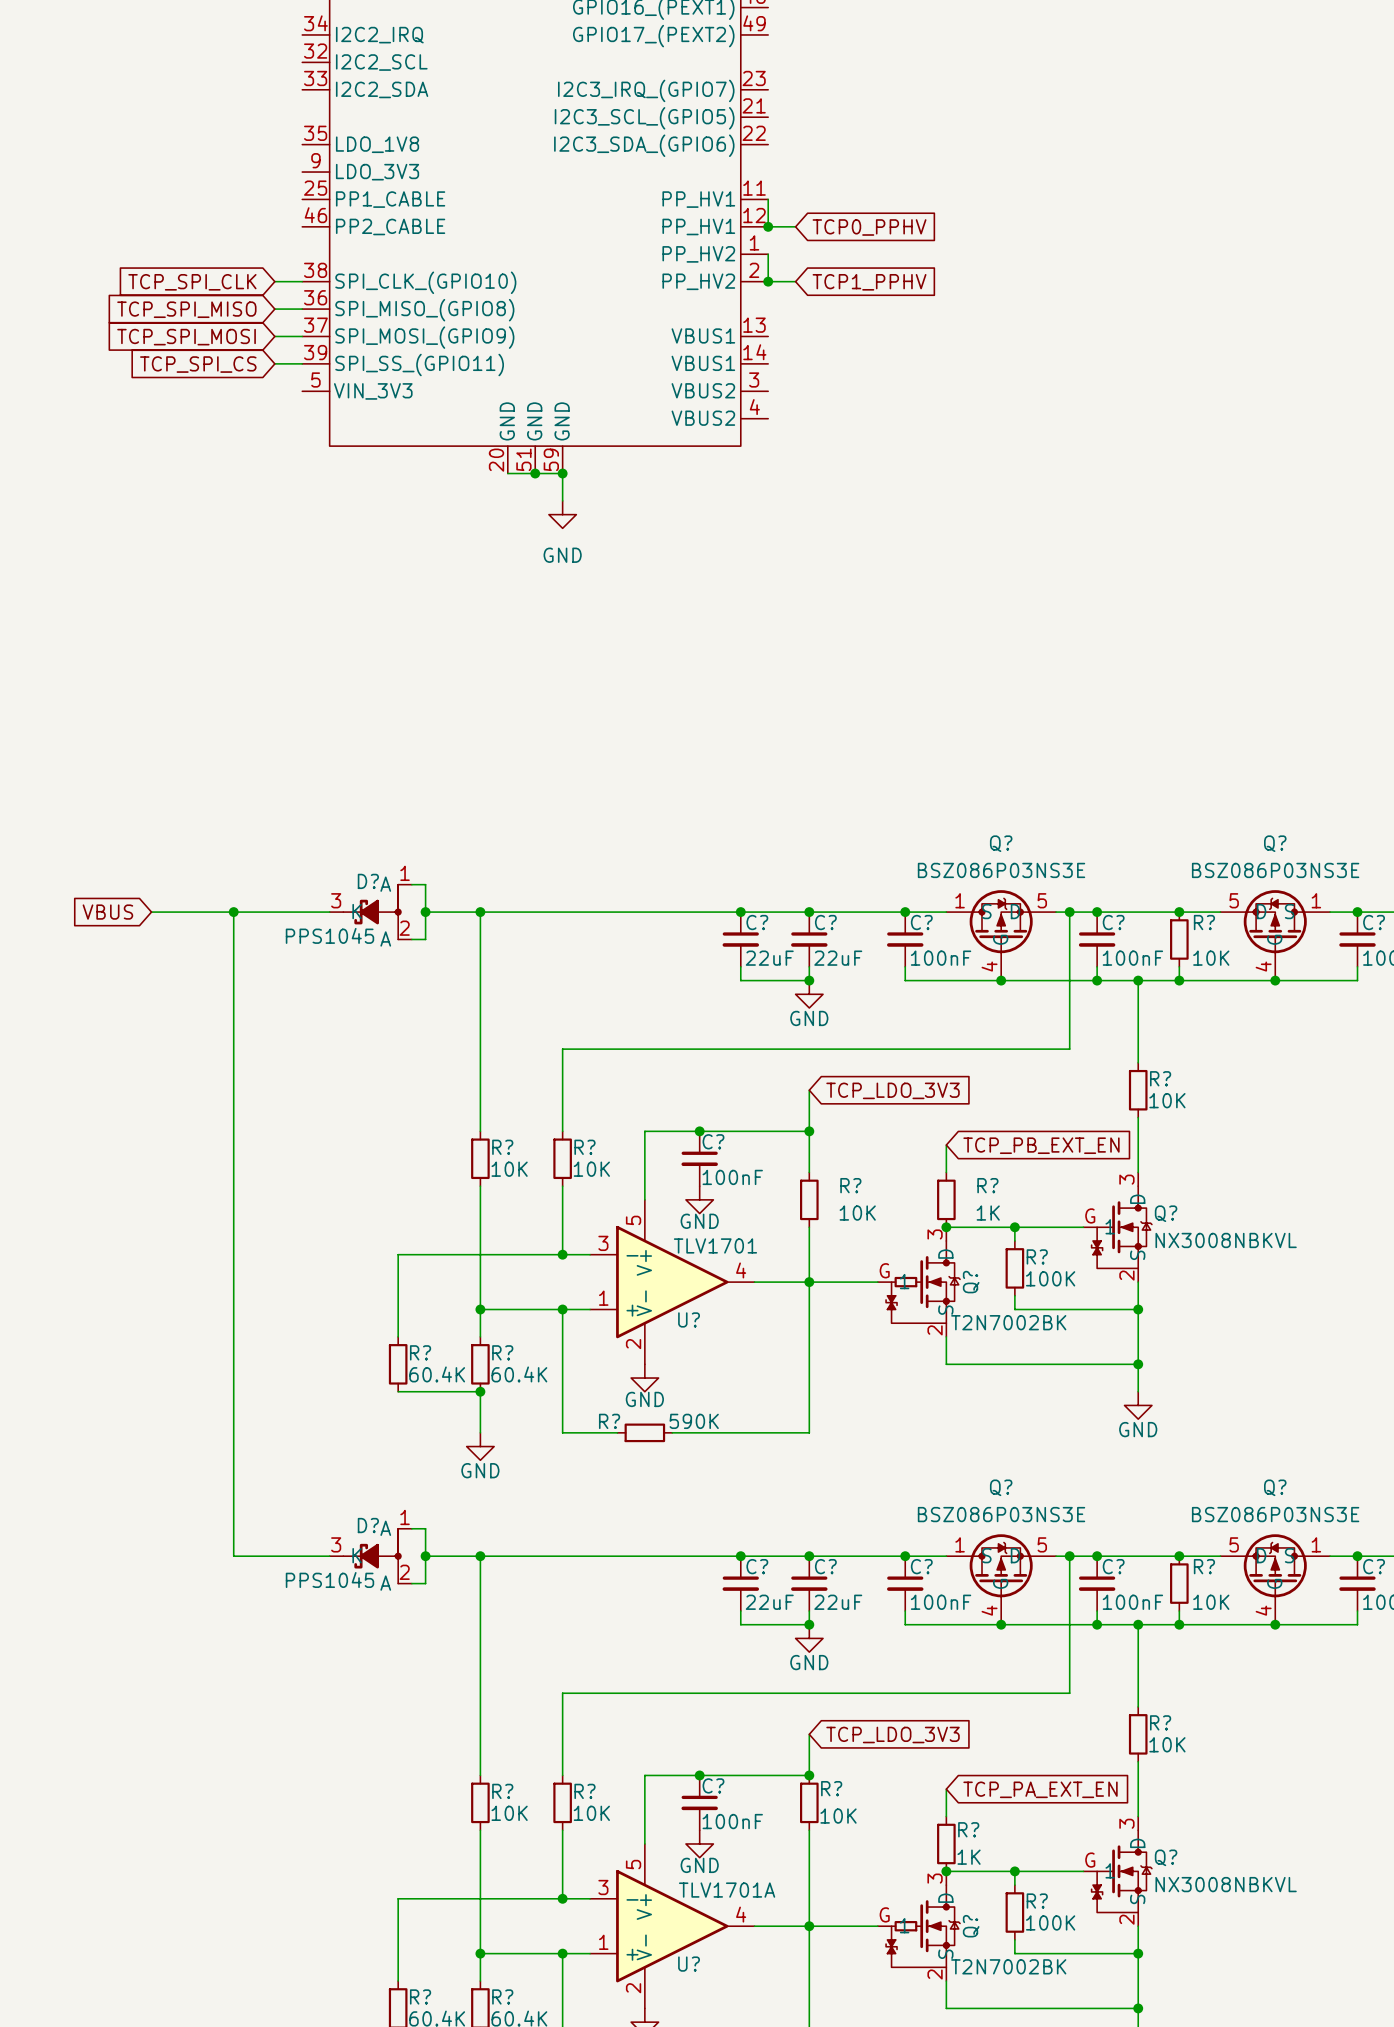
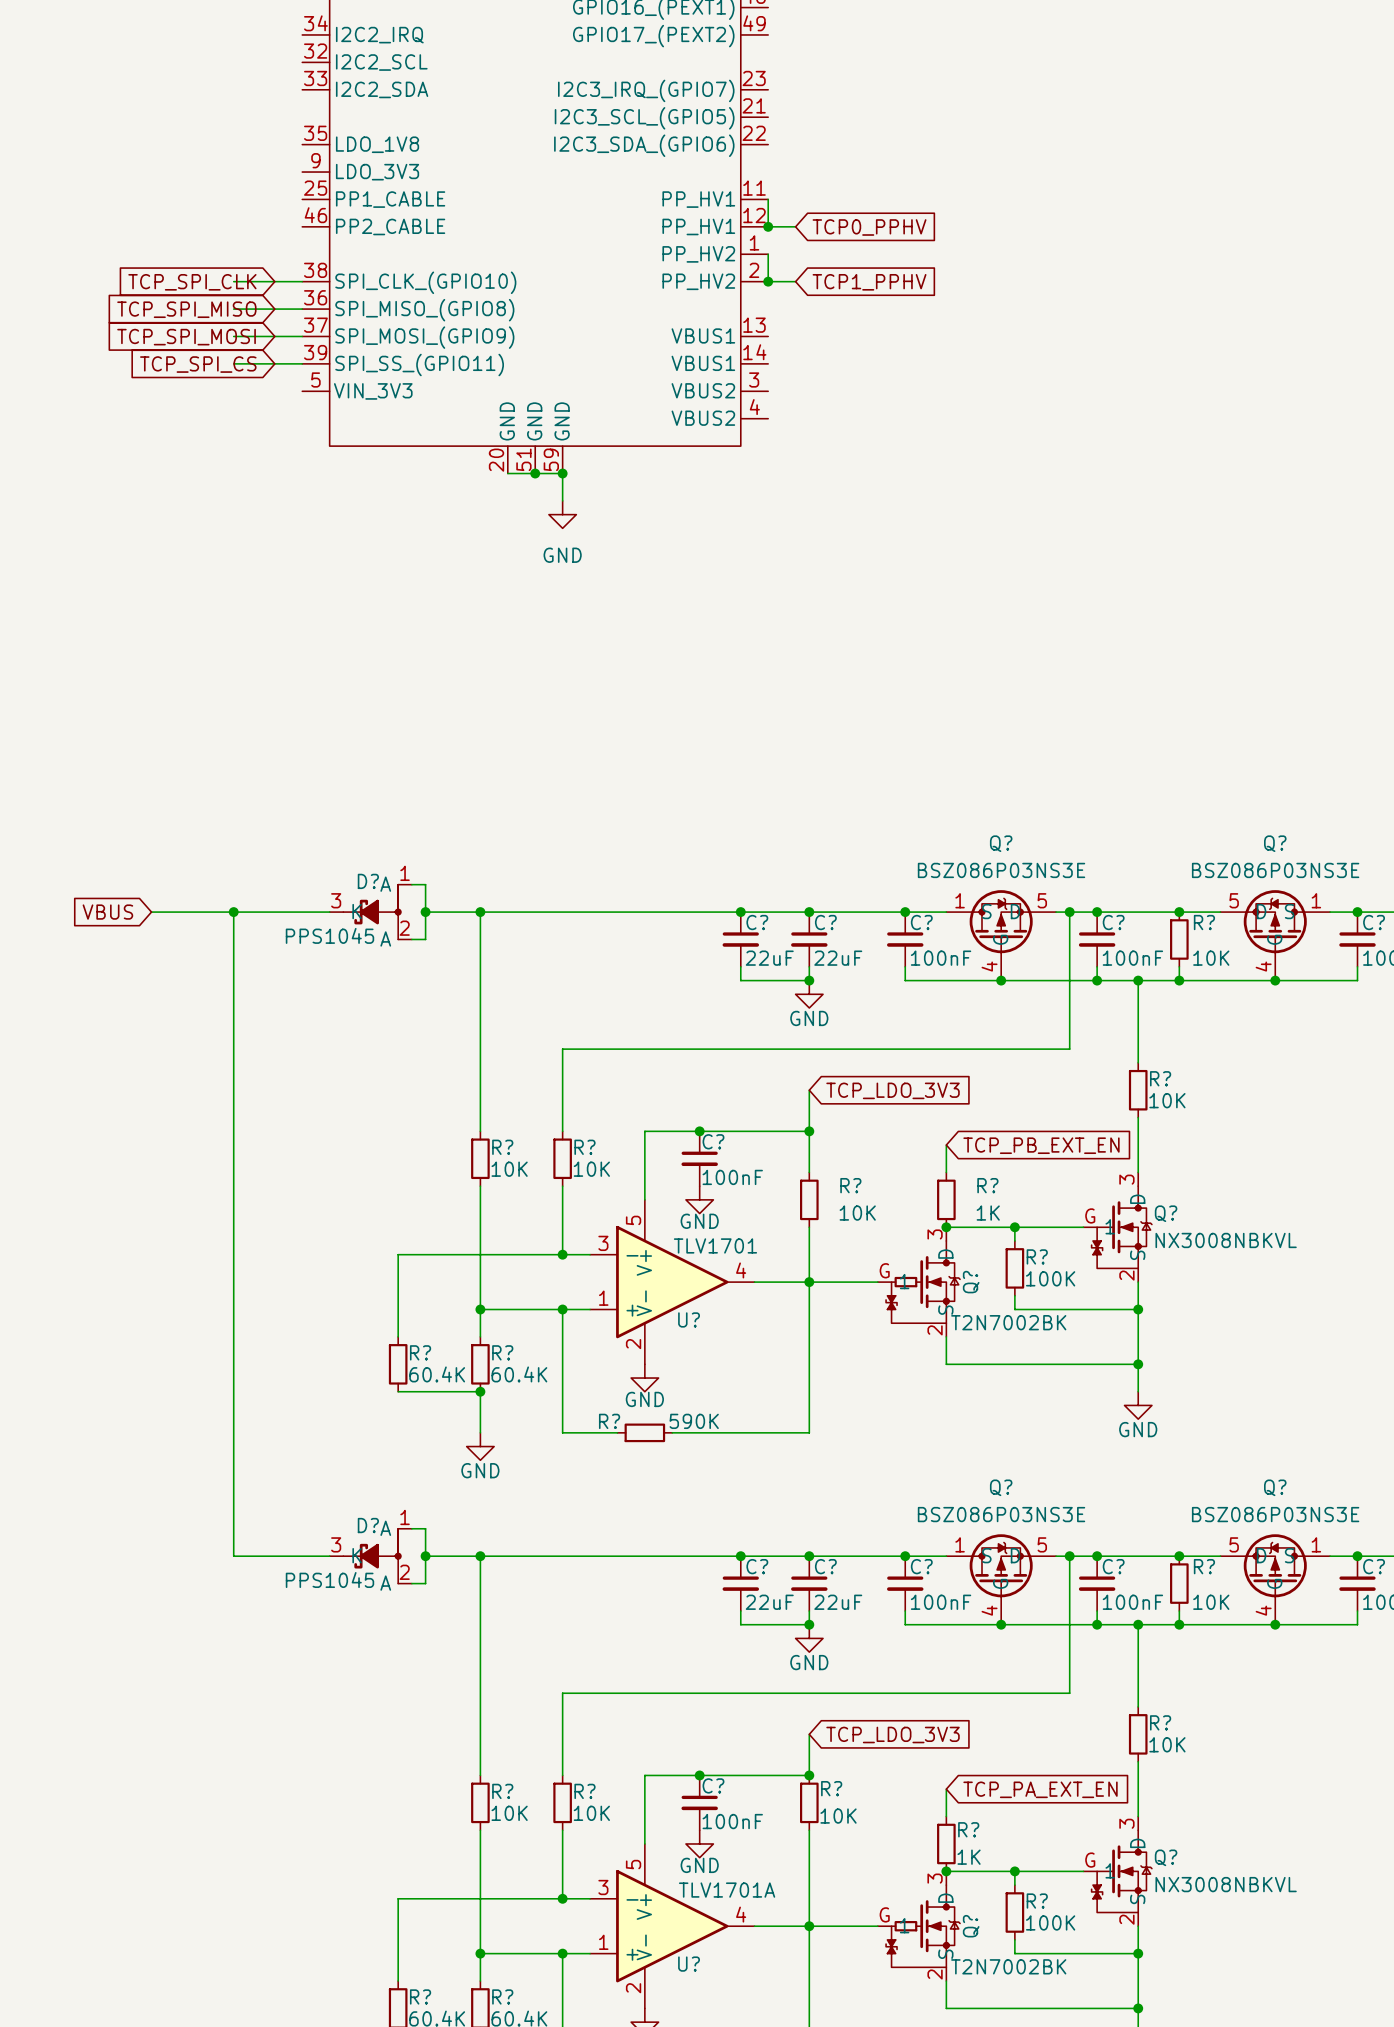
wire: none -> (233, 281) (274, 281)
wire: none -> (233, 309) (274, 309)
wire: none -> (233, 336) (274, 336)
wire: none -> (233, 363) (274, 363)

